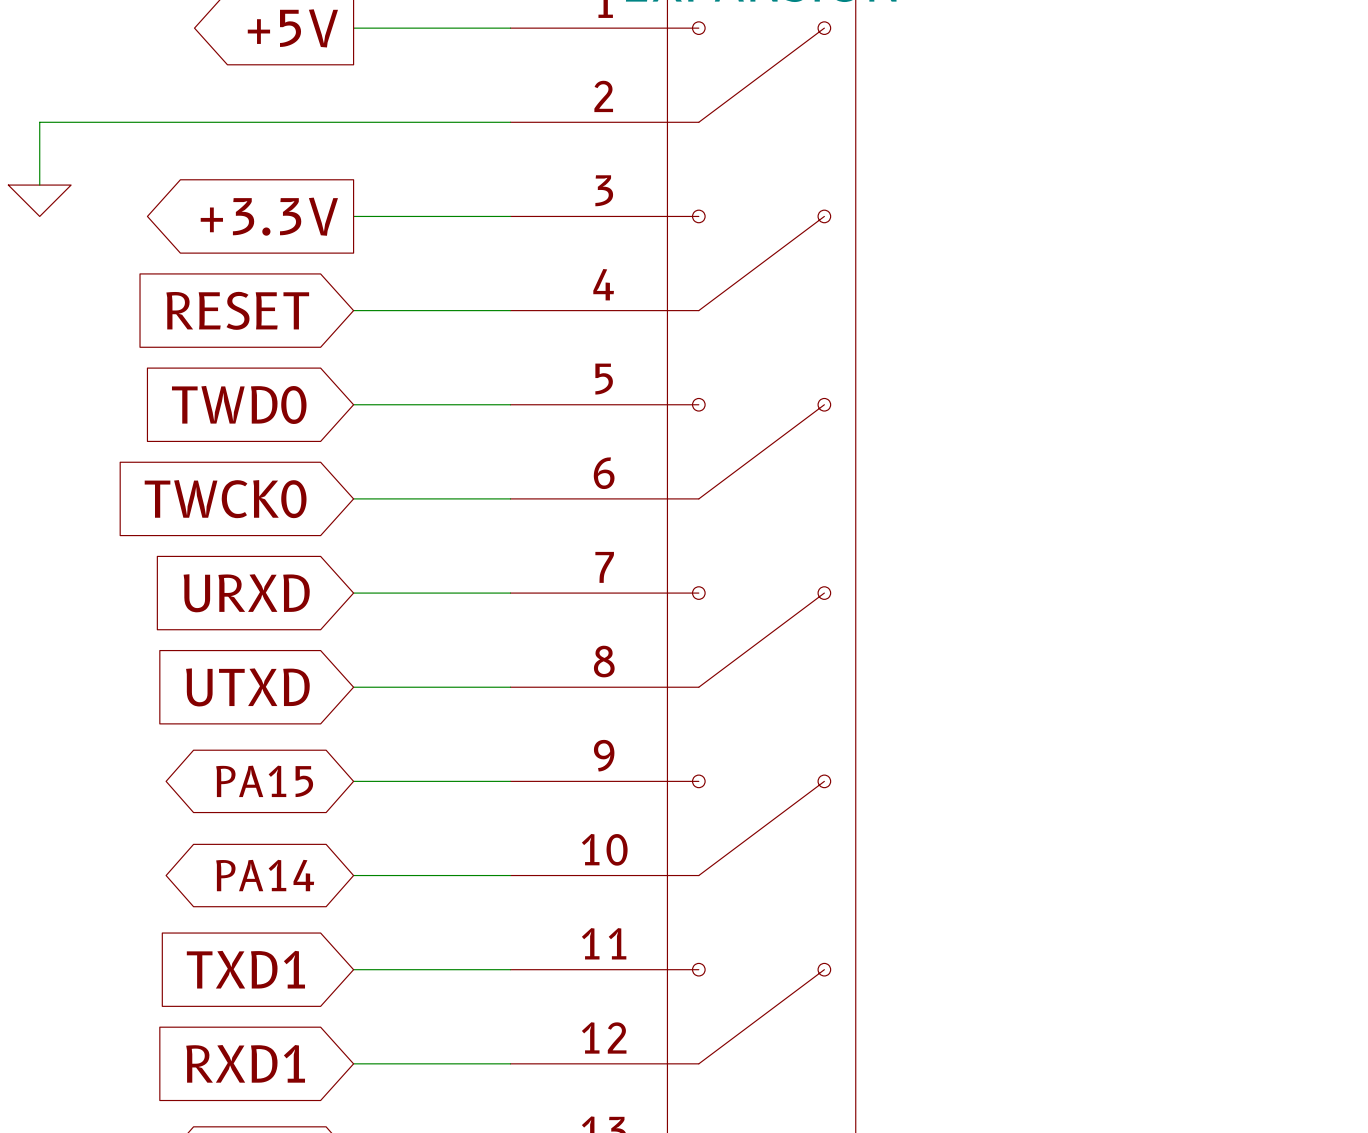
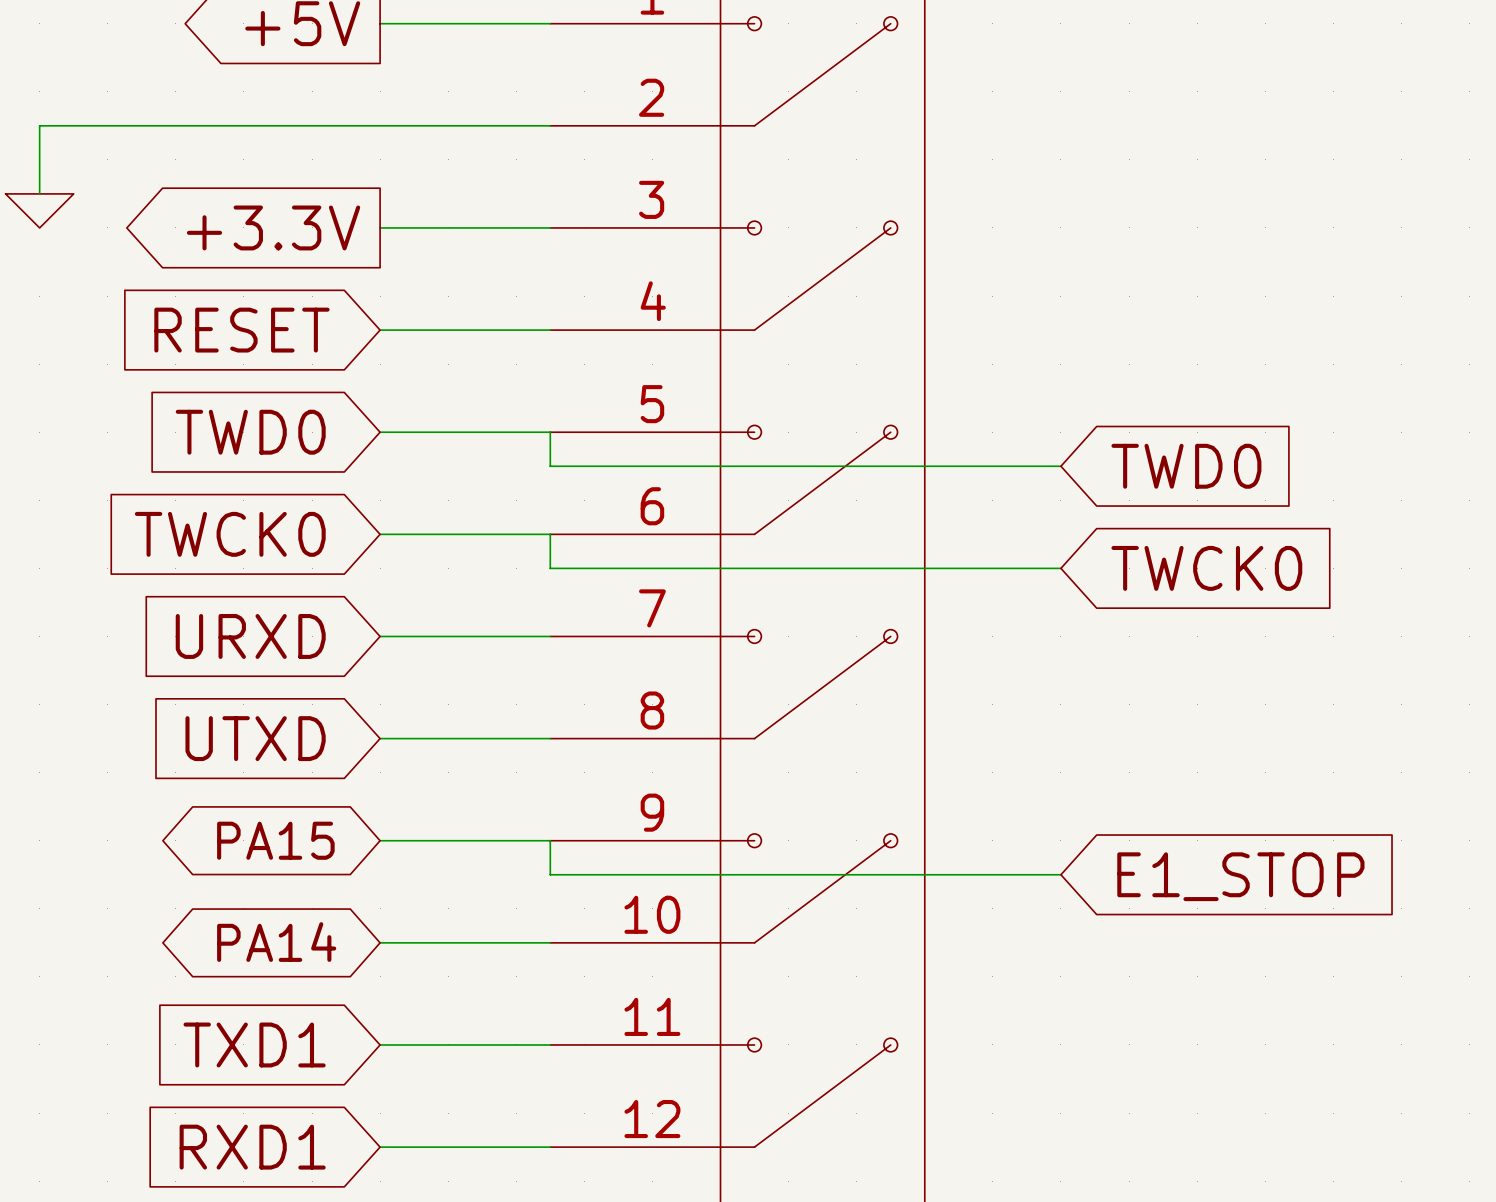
wire: none -> (550, 432) (550, 466) (1060, 466)
global label: none -> TWD0 (1186, 466)
wire: none -> (550, 534) (550, 568) (1060, 568)
global label: none -> TWCK0 (1206, 568)
wire: none -> (550, 840) (550, 874) (1060, 874)
global label: none -> E1_STOP (1240, 876)

